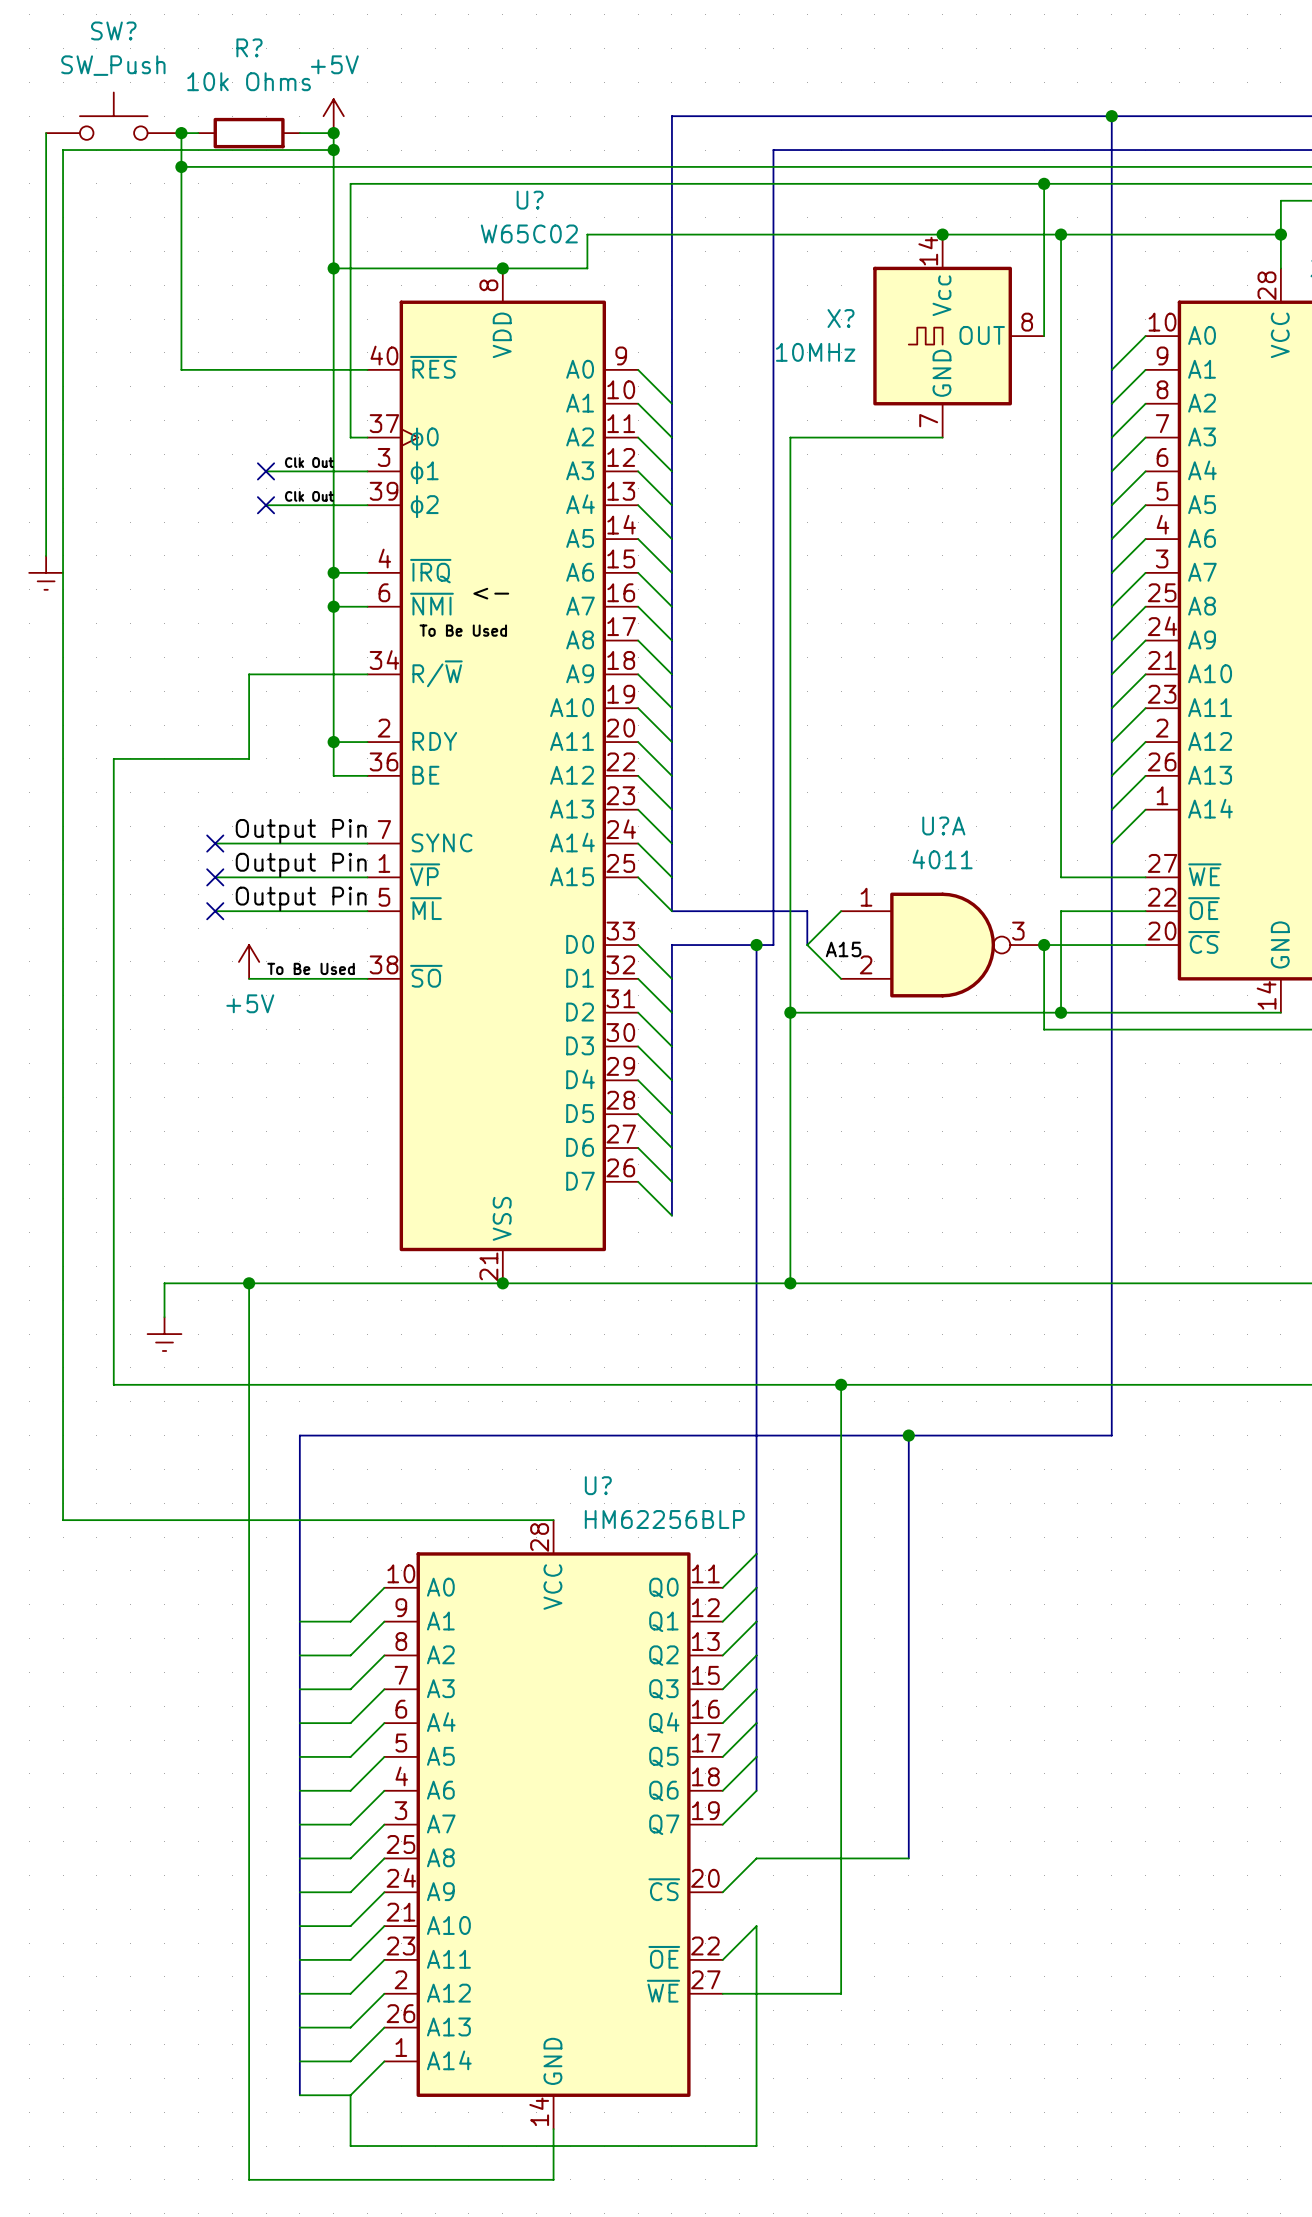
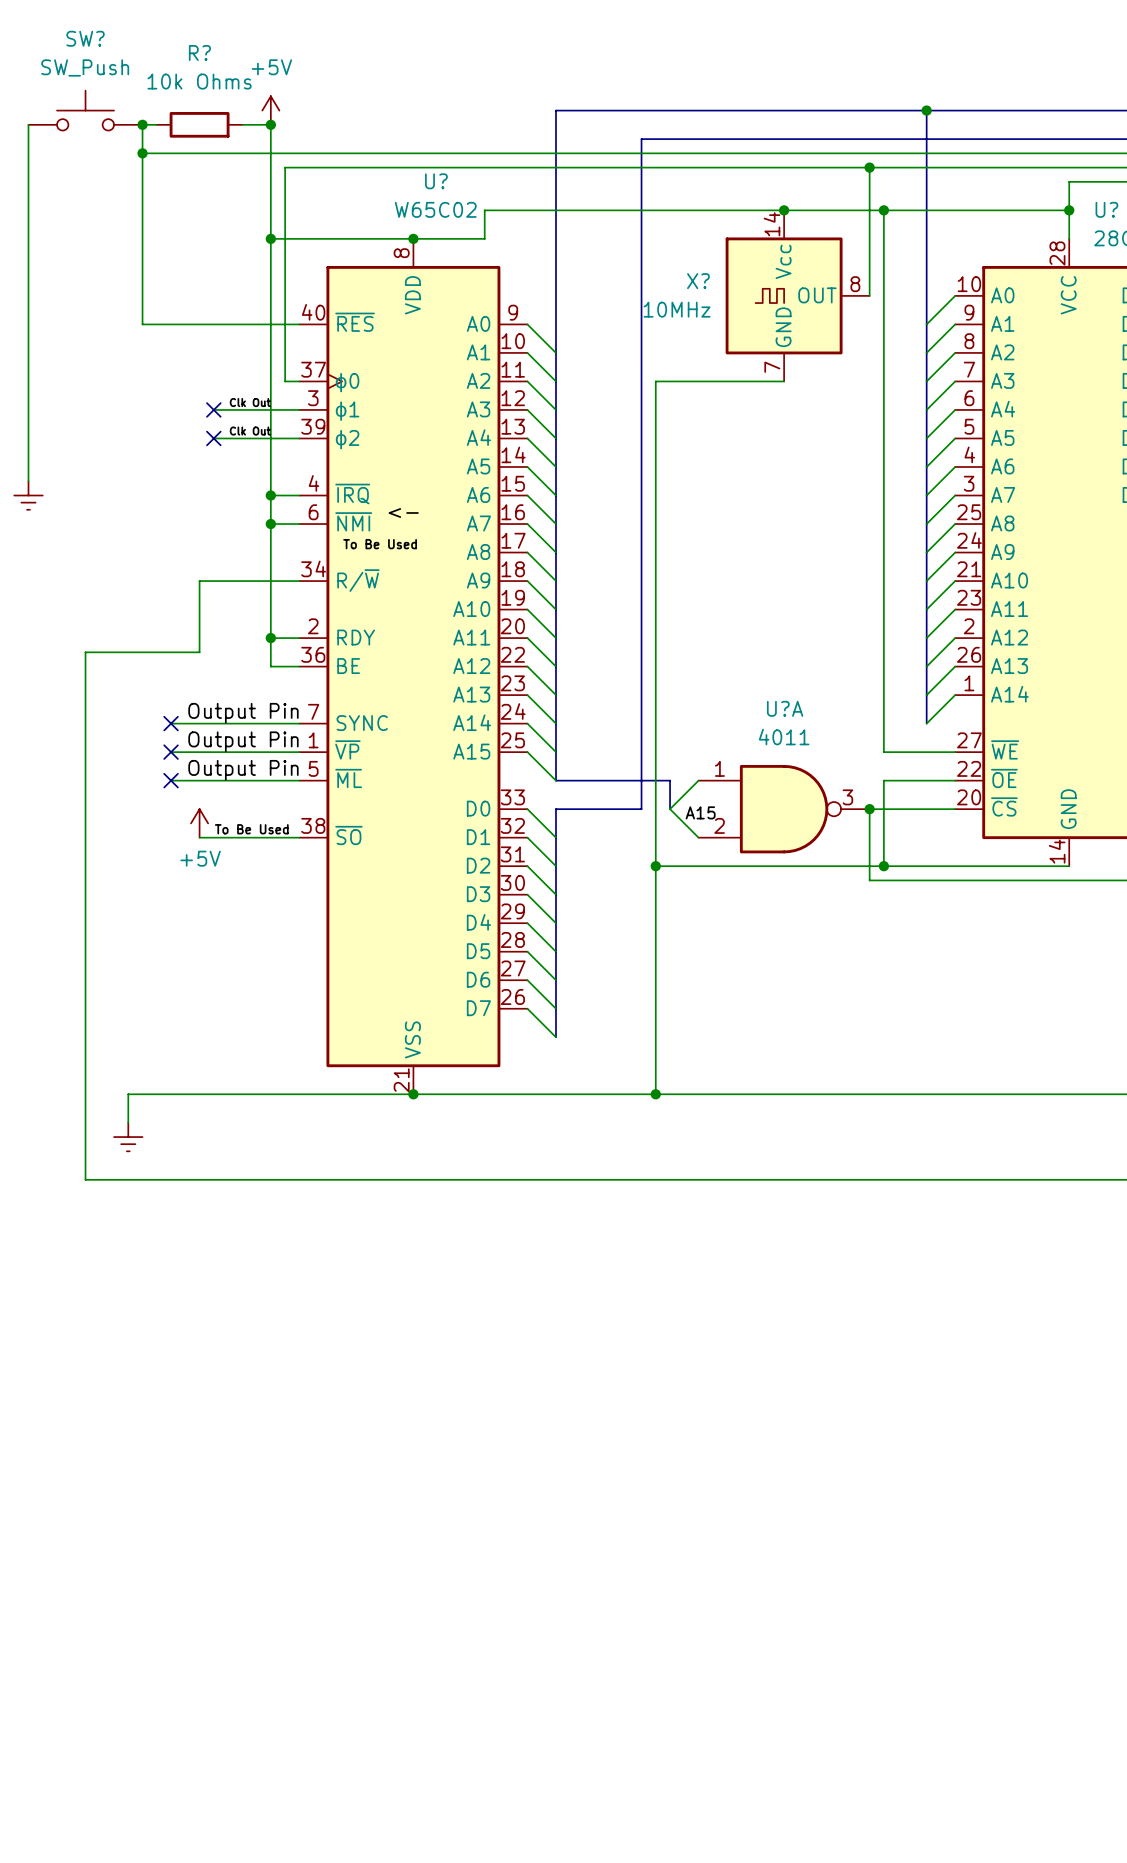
wire: (333, 150) (63, 150) (63, 1520) (553, 1520) -> none
junction: (333, 150) -> none
bus: (1111, 843) (1111, 1435) (299, 1435) (299, 2095) -> none
bus: (756, 945) (756, 1790) -> none
junction: (756, 945) -> none
wire: (249, 1283) (249, 2179) (553, 2179) (553, 2129) -> none
junction: (249, 1283) -> none
wire: (841, 1384) (841, 1993) (722, 1993) -> none
junction: (841, 1384) -> none
bus: (908, 1435) (908, 1858) -> none
junction: (908, 1435) -> none
wire: (756, 1553) (722, 1587) -> none
wire: (384, 1587) (350, 1621) (299, 1621) -> none
wire: (756, 1587) (722, 1621) -> none
wire: (384, 1621) (350, 1655) (299, 1655) -> none
wire: (756, 1621) (722, 1655) -> none
wire: (384, 1655) (350, 1689) (299, 1689) -> none
wire: (756, 1655) (722, 1689) -> none
wire: (384, 1689) (350, 1723) (299, 1723) -> none
wire: (756, 1689) (722, 1723) -> none
wire: (384, 1723) (350, 1756) (299, 1756) -> none
wire: (756, 1723) (722, 1756) -> none
wire: (384, 1756) (350, 1790) (299, 1790) -> none
wire: (756, 1756) (722, 1790) -> none
wire: (384, 1790) (350, 1824) (299, 1824) -> none
wire: (756, 1790) (722, 1824) -> none
wire: (384, 1824) (350, 1858) (299, 1858) -> none
U?: HM62256BLP (553, 1824) -> none
wire: (384, 1858) (350, 1892) (299, 1892) -> none
wire: (908, 1858) (756, 1858) (722, 1892) -> none
wire: (384, 1892) (350, 1926) (299, 1926) -> none
wire: (384, 1926) (350, 1959) (299, 1959) -> none
wire: (384, 1959) (350, 1993) (299, 1993) -> none
wire: (722, 1959) (756, 1926) (756, 2146) (350, 2146) (350, 2095) -> none
wire: (384, 1993) (350, 2027) (299, 2027) -> none
wire: (384, 2027) (350, 2061) (299, 2061) -> none
wire: (384, 2061) (350, 2095) -> none
wire: (299, 2095) (350, 2095) -> none

